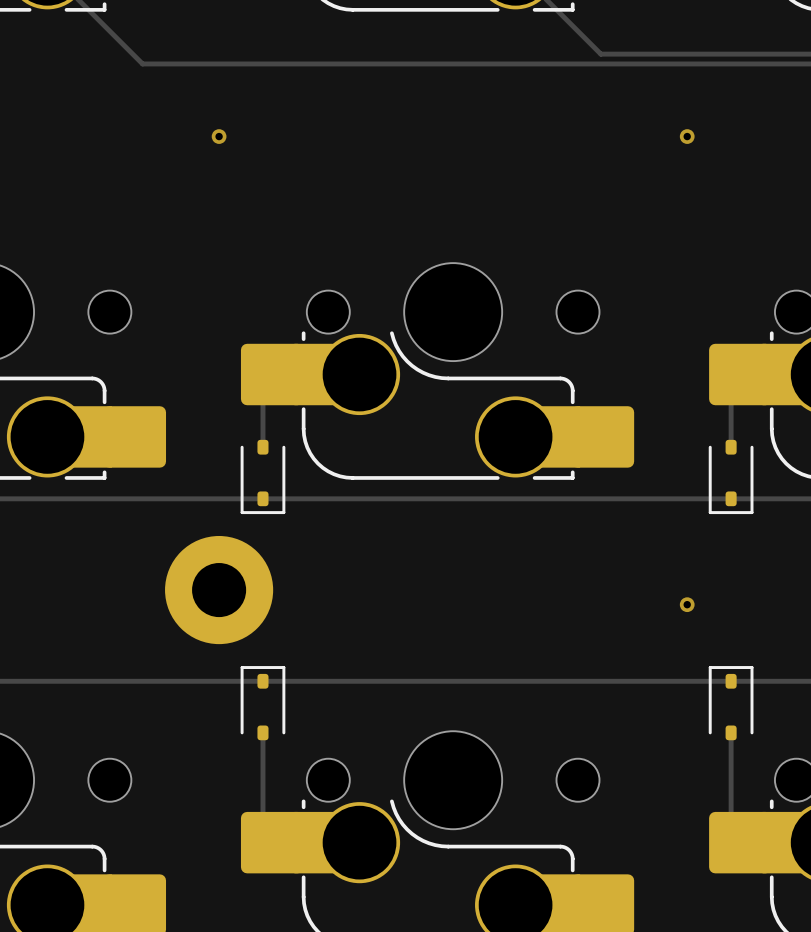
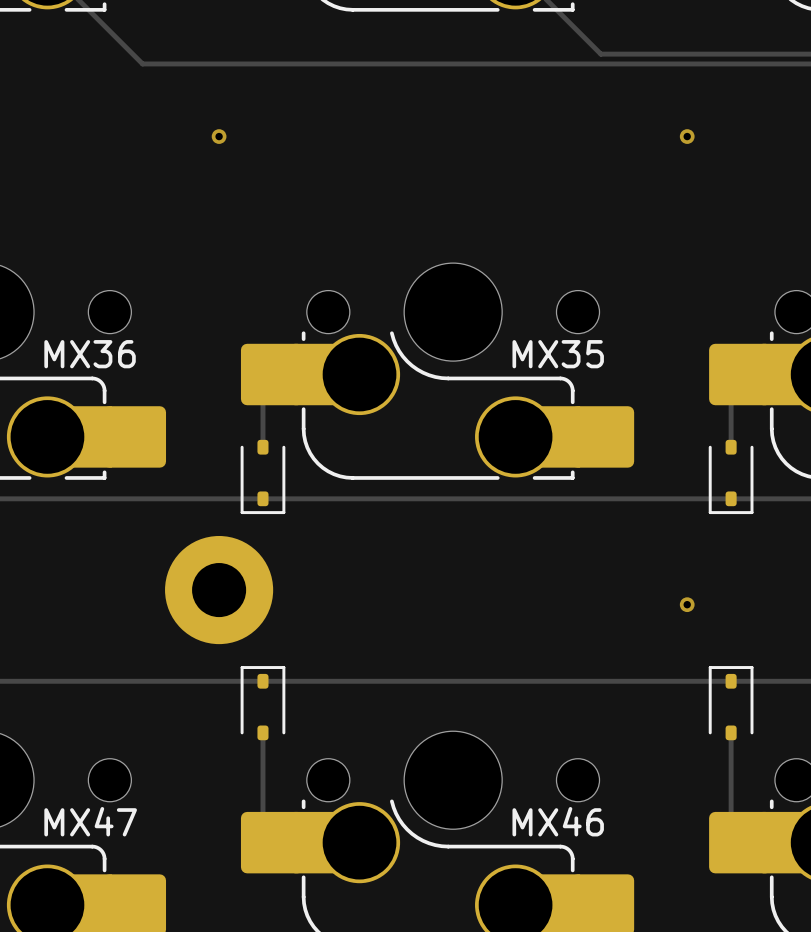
MX36 name: none -> MX36 (90, 354)
MX35 name: none -> MX35 (558, 354)
MX47 name: none -> MX47 (90, 821)
MX46 name: none -> MX46 (558, 821)

